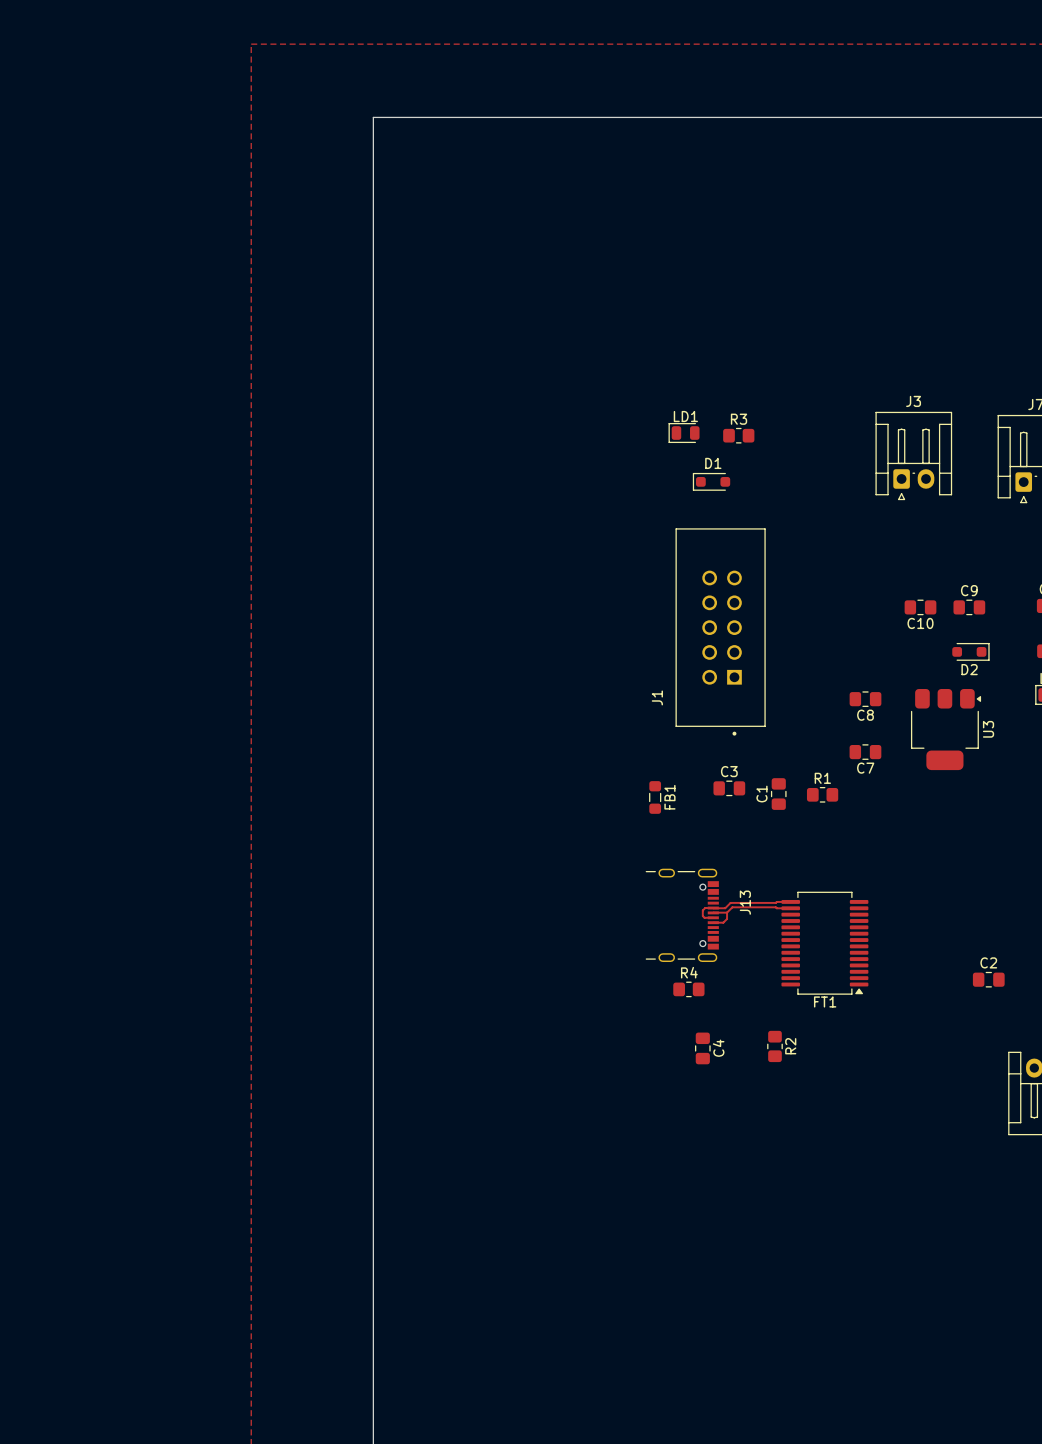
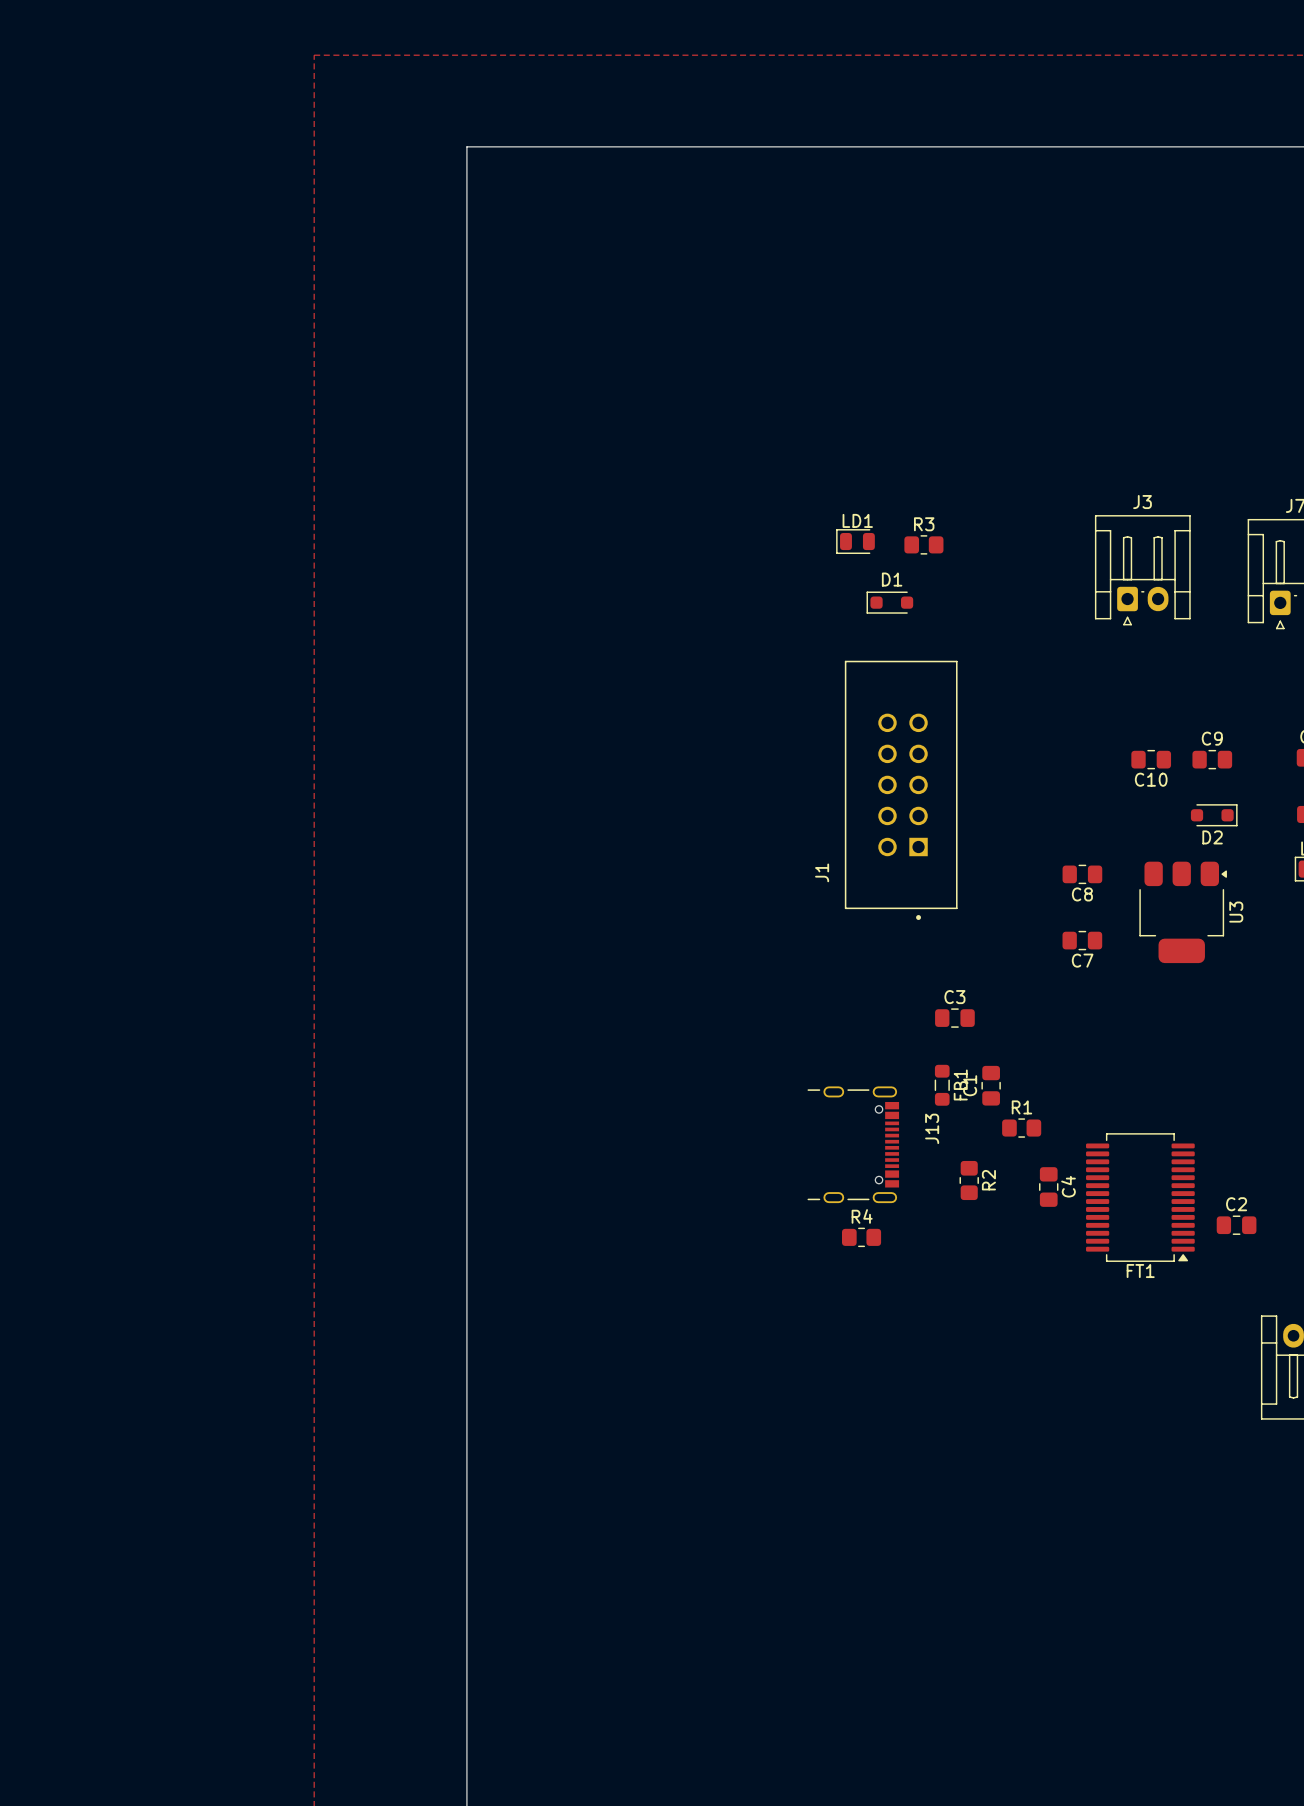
C3 position: (729, 788) -> (954, 1018)
C1 position: (778, 794) -> (991, 1085)
R1 position: (822, 794) -> (1021, 1128)
FB1 position: (655, 797) -> (942, 1085)
top track: (790, 901) (730, 902) (725, 908) (705, 908) (702, 910) (704, 917) (713, 917) -> none
top track: (790, 908) (732, 907) (727, 912) -> none
top track: (727, 912) (713, 912) -> none
top track: (727, 912) (727, 918) (723, 922) (713, 922) -> none
FT1 position: (824, 943) -> (1140, 1197)
R2 position: (774, 1046) -> (969, 1180)
C4 position: (702, 1048) -> (1048, 1187)

